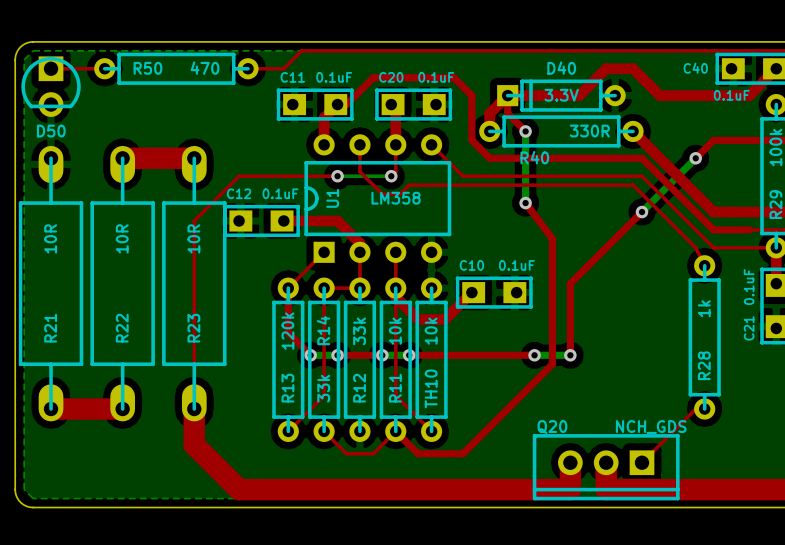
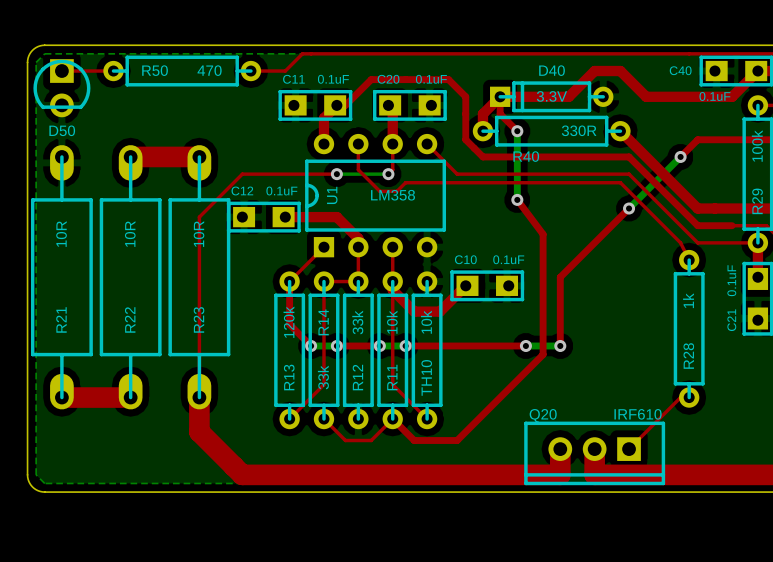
Q20 value: NCH_GDS (651, 427) -> IRF610 (638, 414)

